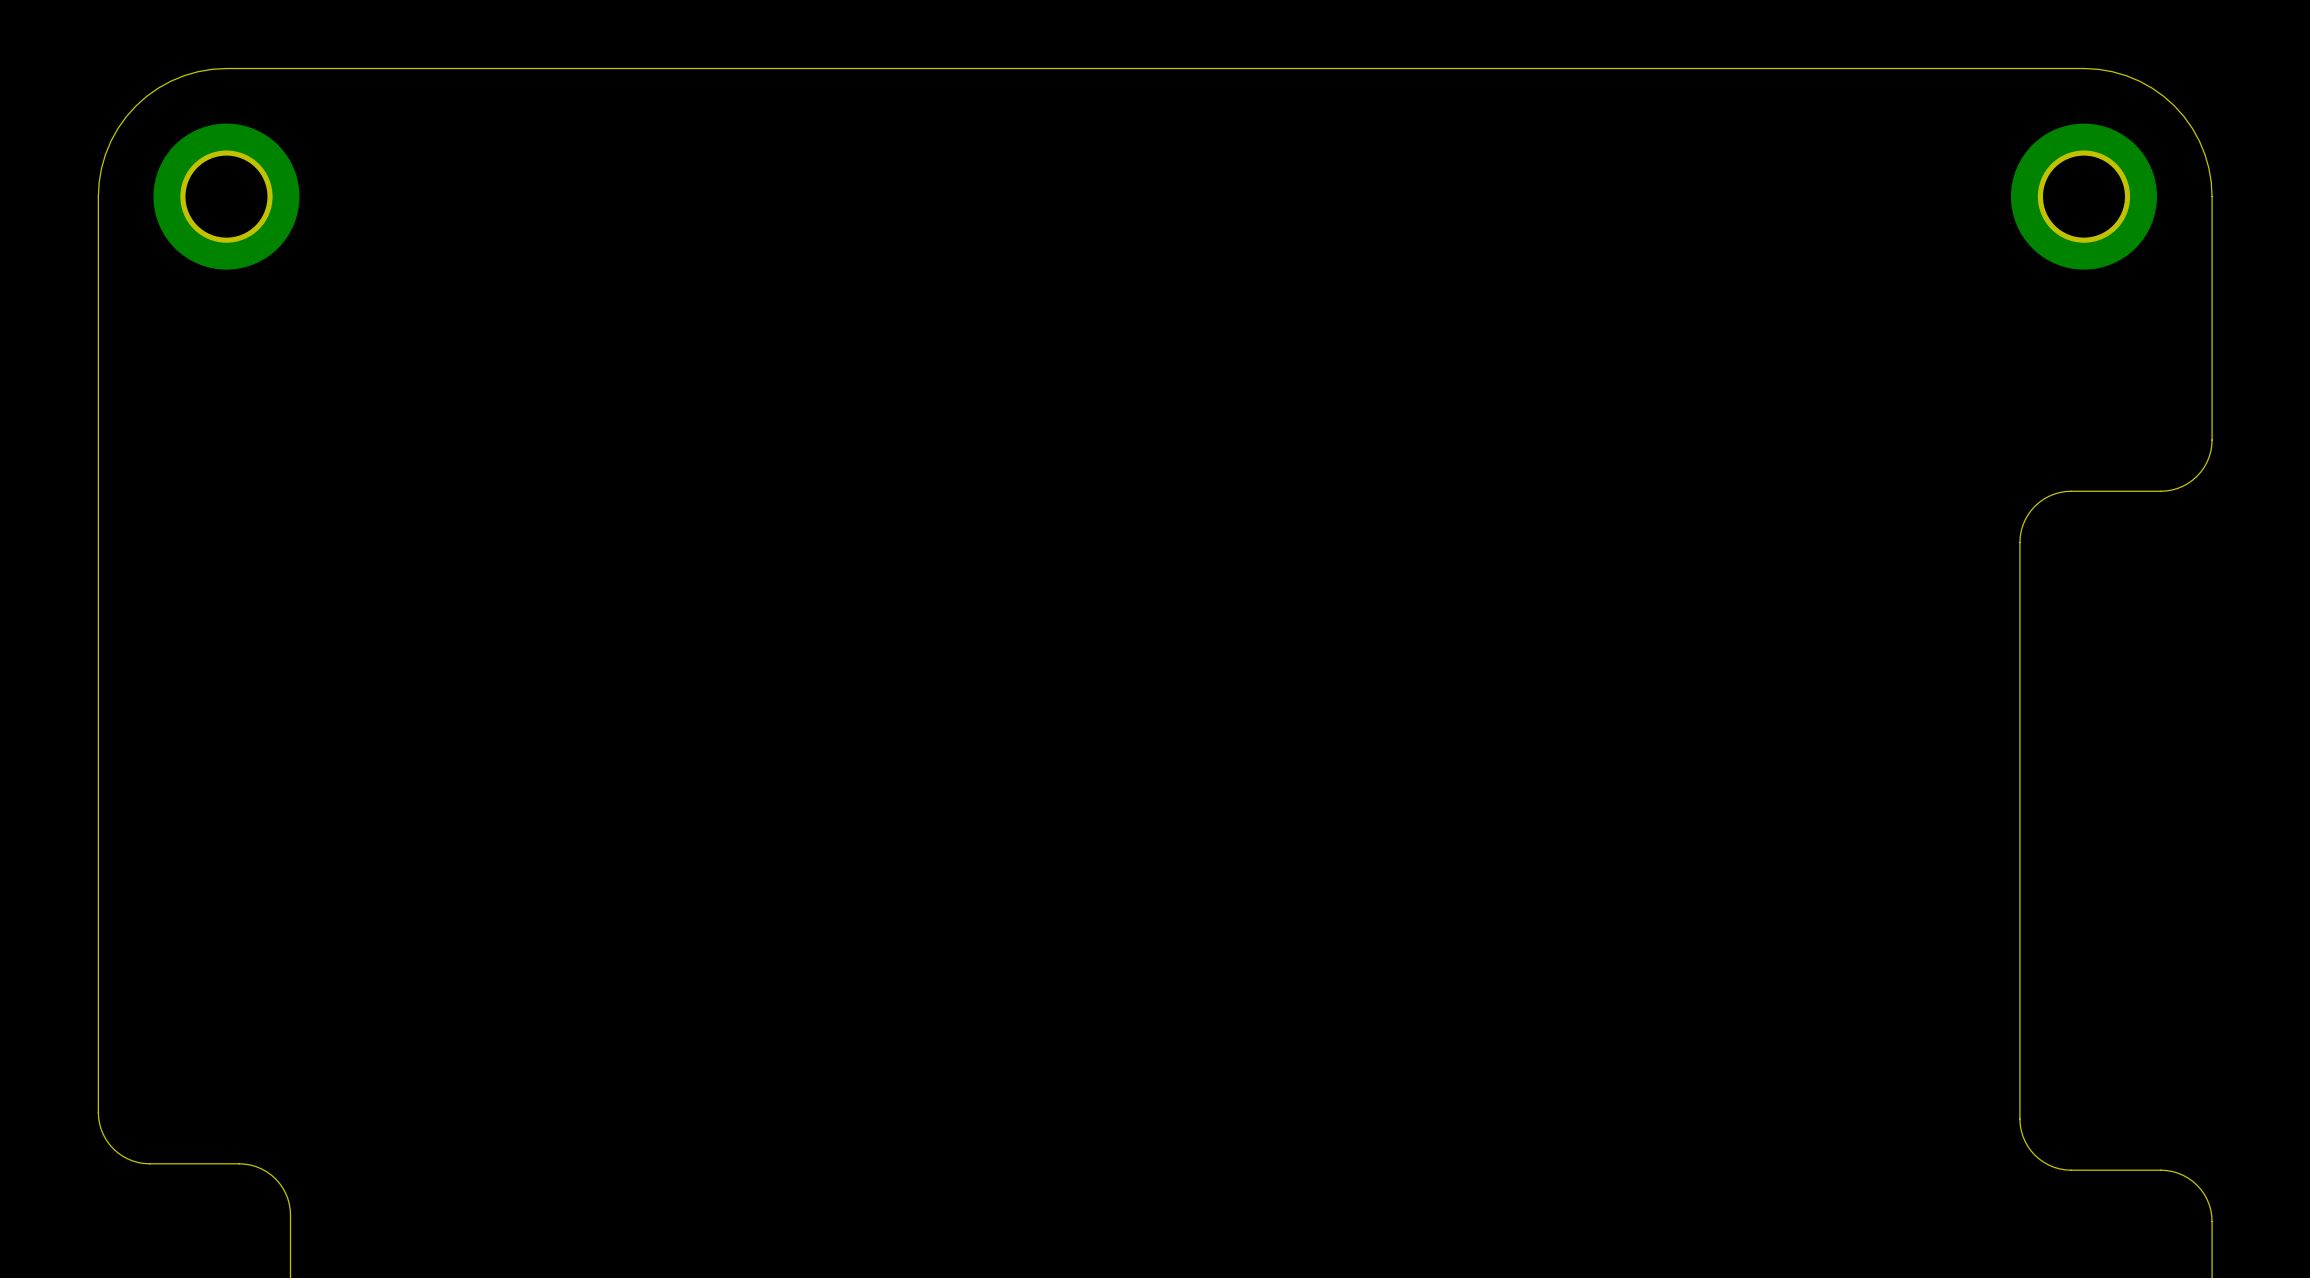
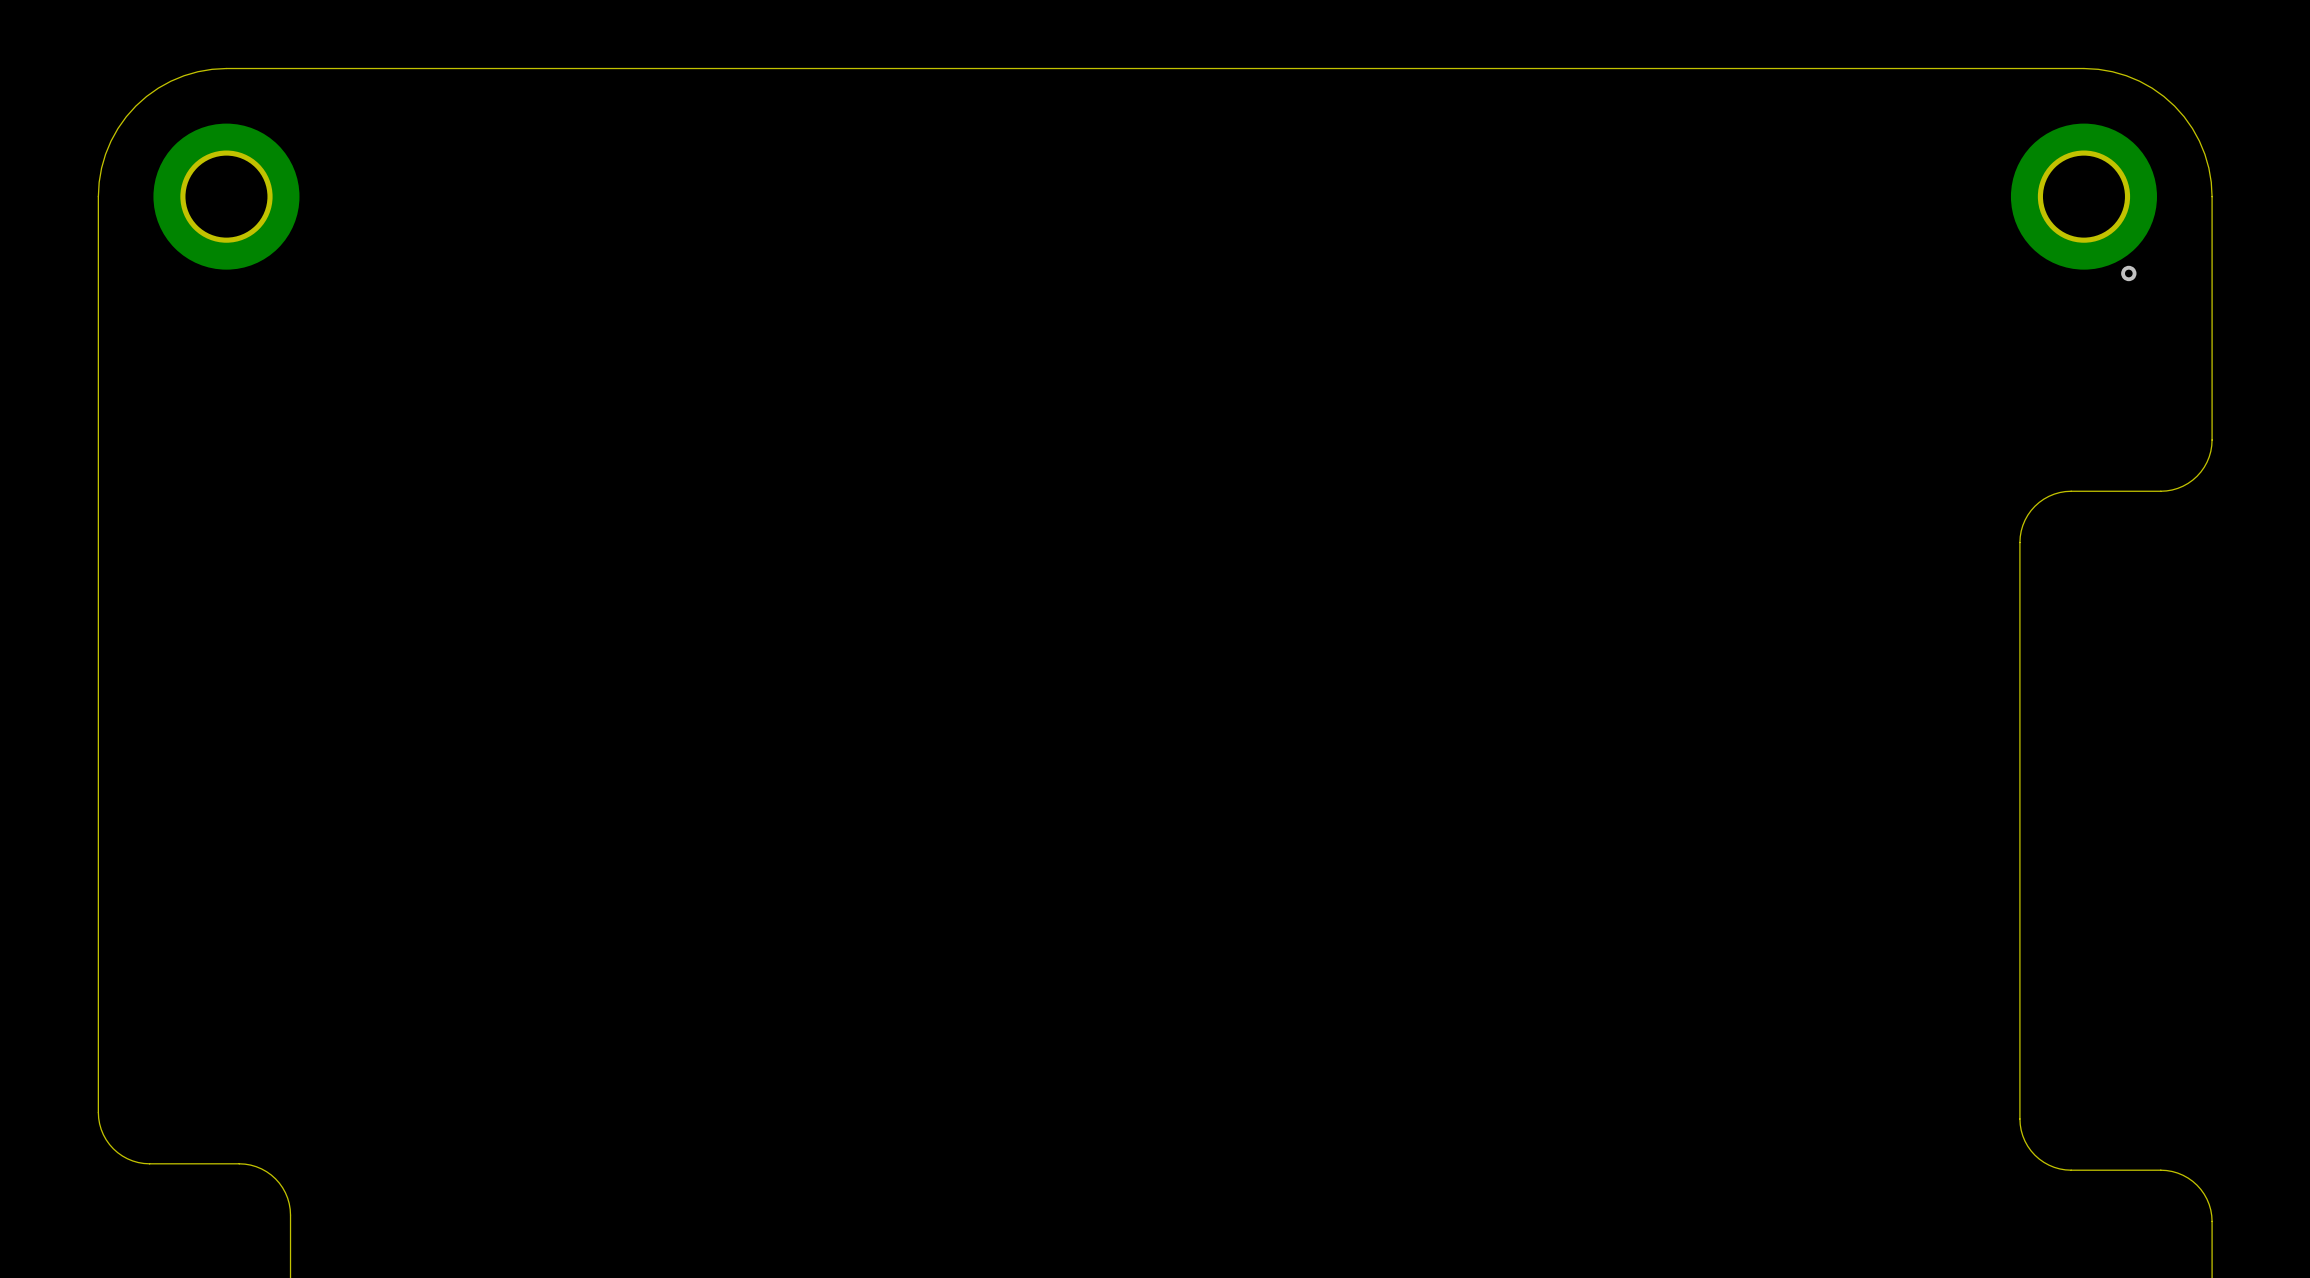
via: none -> (2128, 273)

